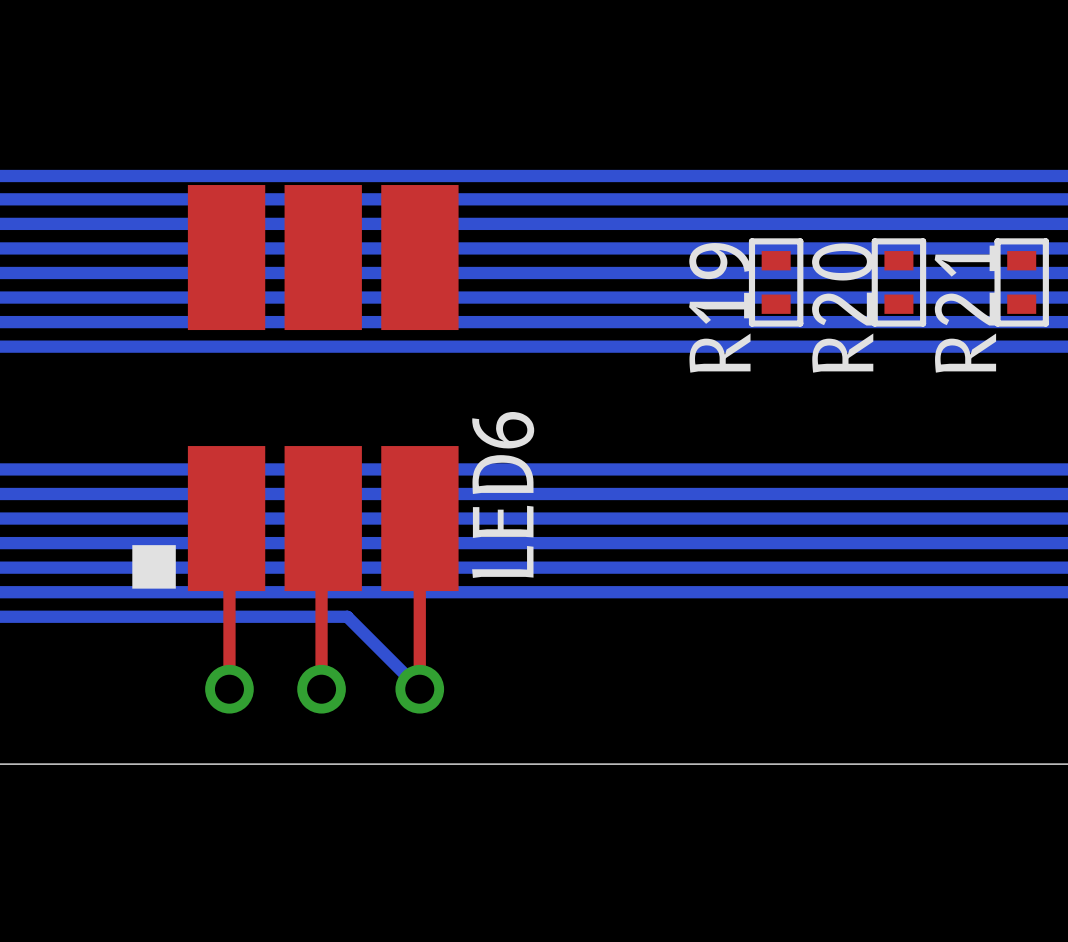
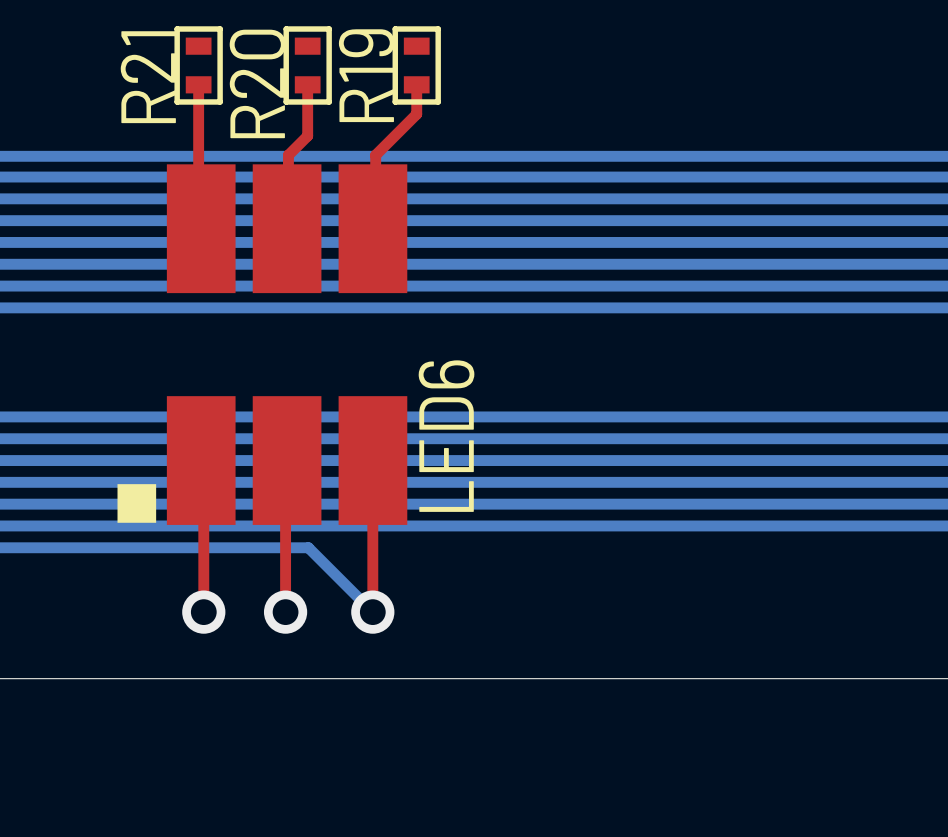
top track: none -> (198, 84) (198, 226) (201, 228)
top track: none -> (307, 84) (307, 135) (288, 155) (287, 228)
top track: none -> (416, 84) (416, 114) (375, 155) (375, 225) (372, 228)
R19 position: (776, 282) -> (416, 65)
R20 position: (898, 282) -> (307, 65)
R21 position: (1021, 282) -> (198, 65)

